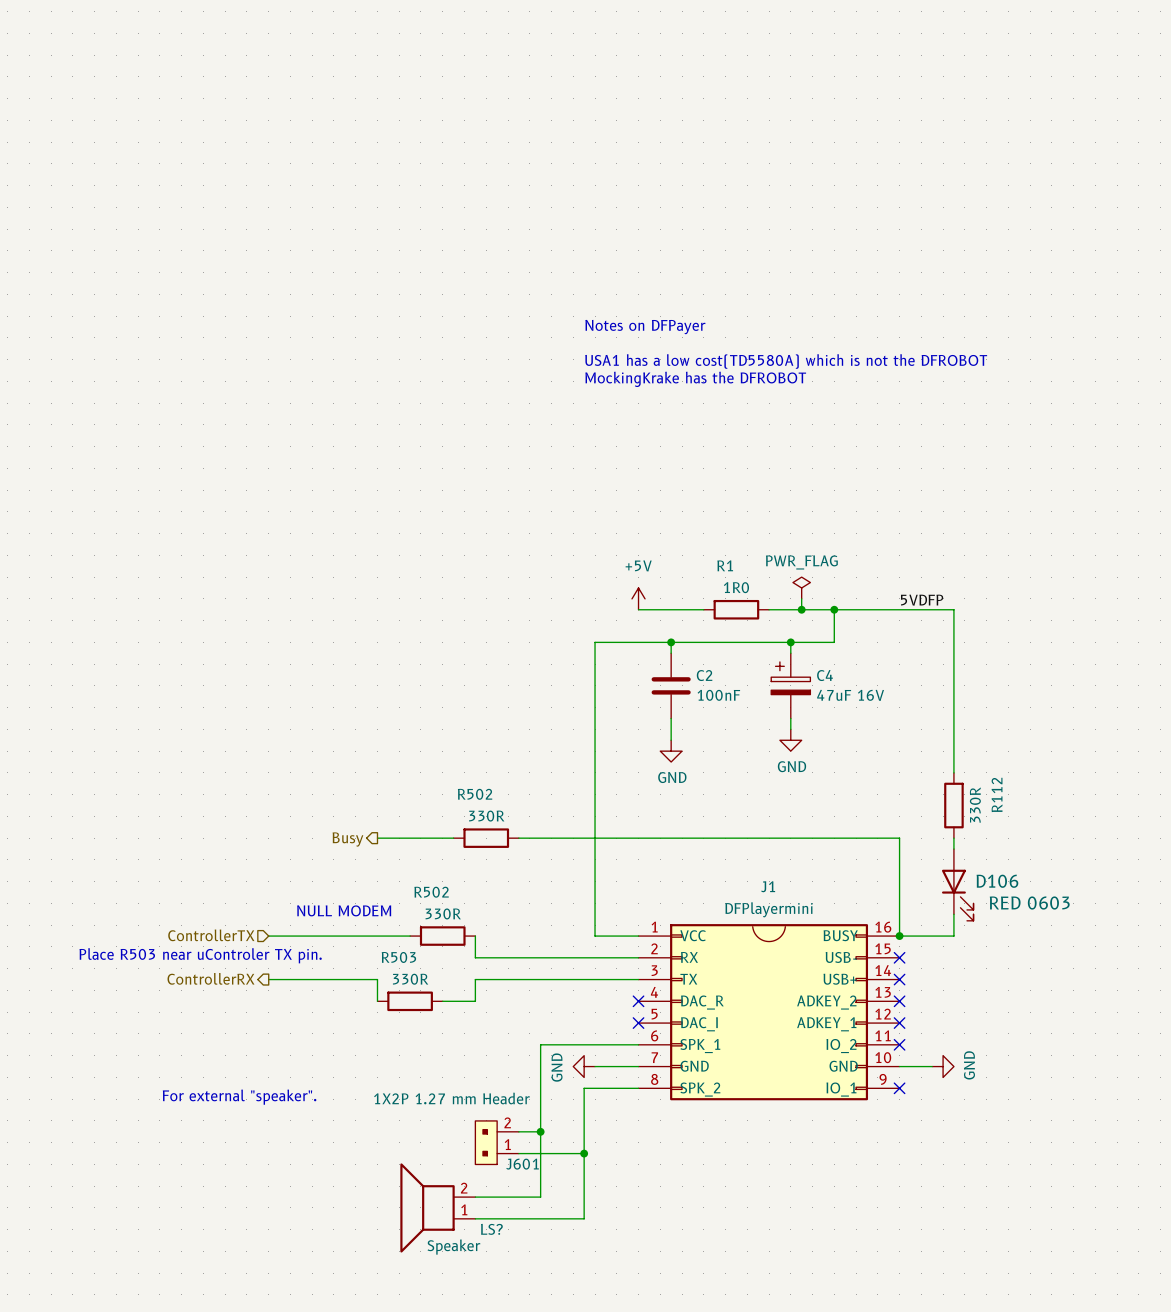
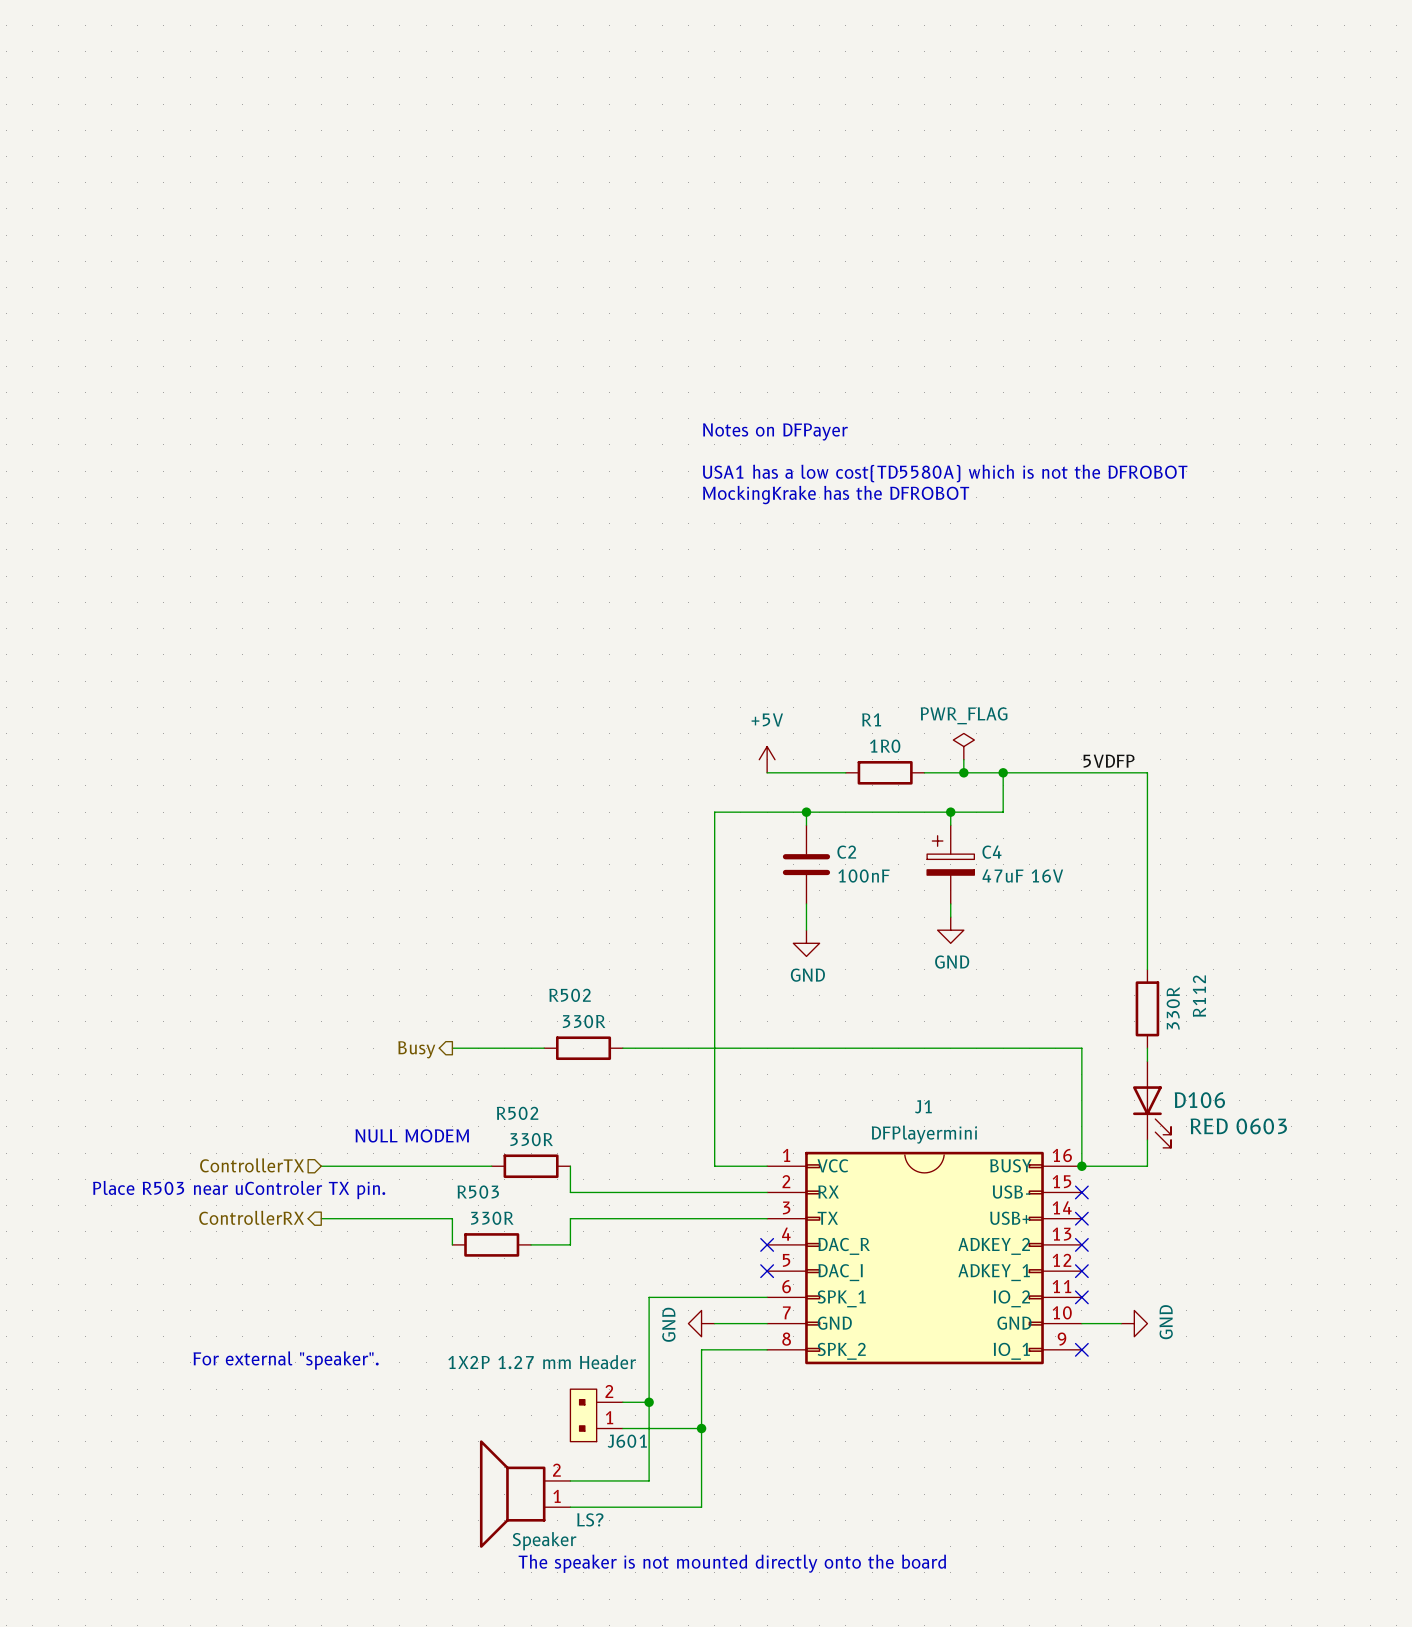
text: none -> The speaker is not mounted directly onto the board (732, 1563)

